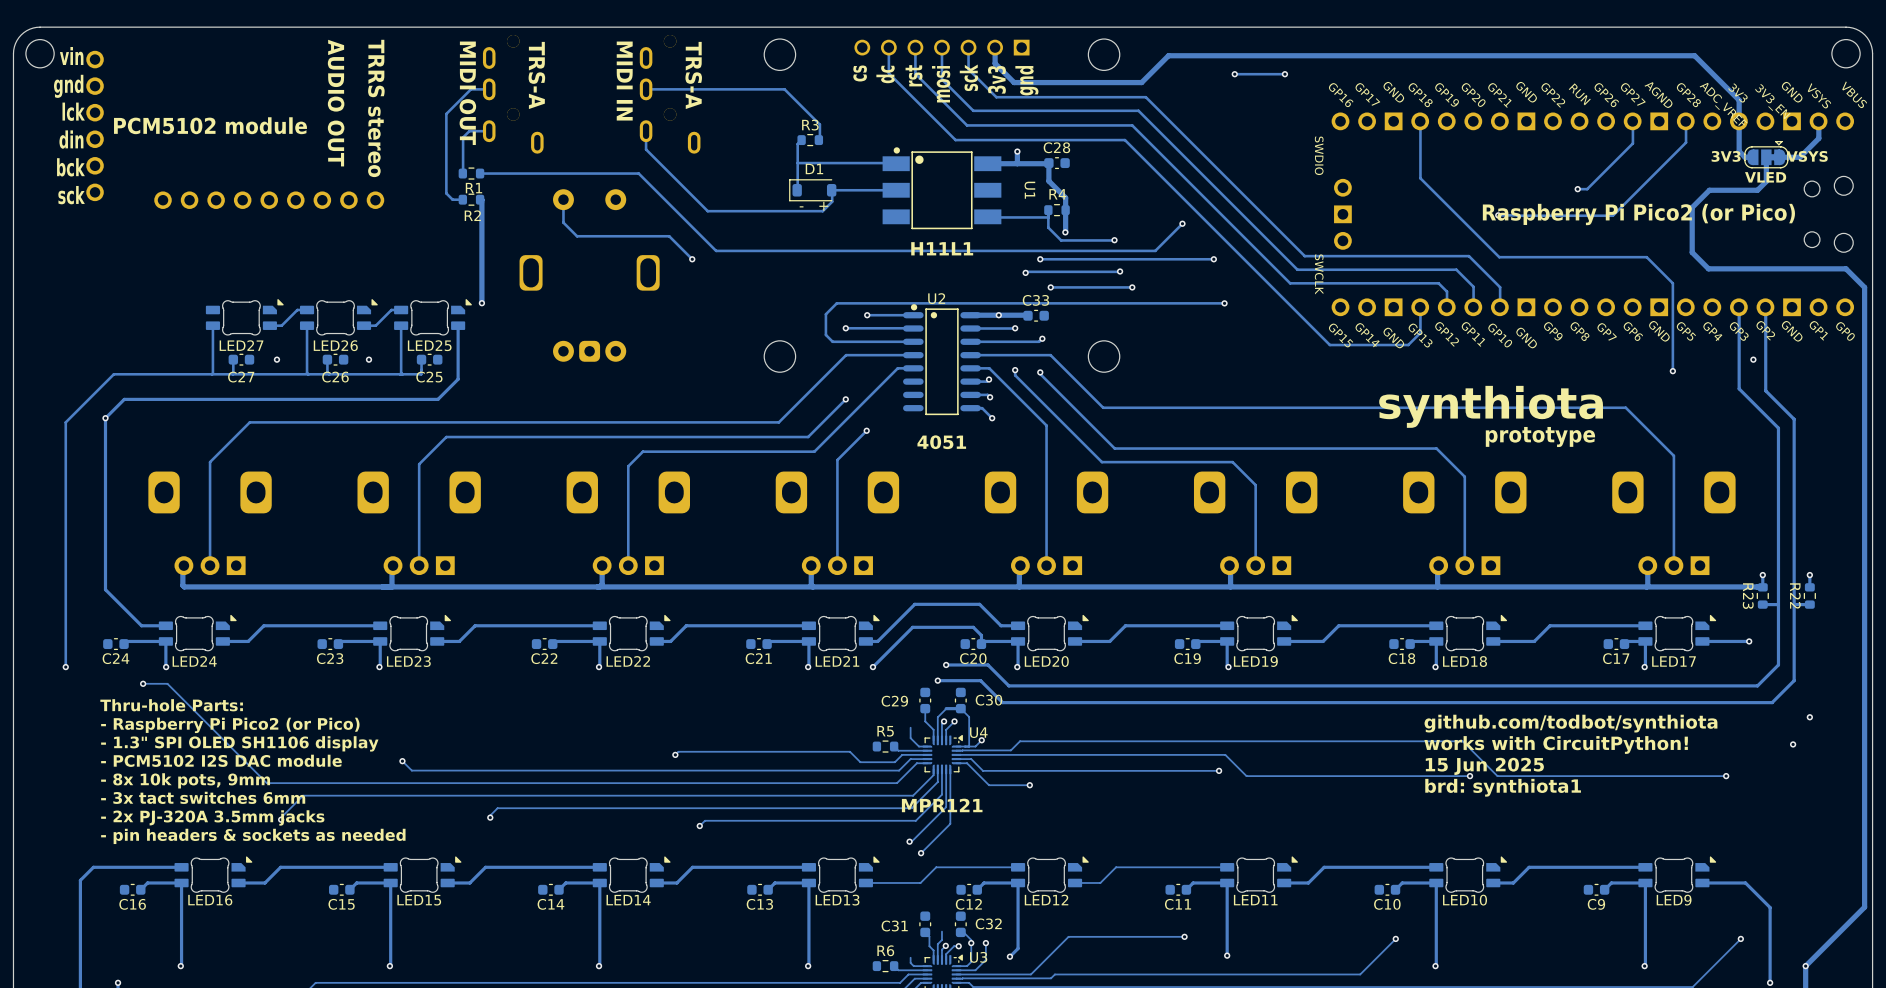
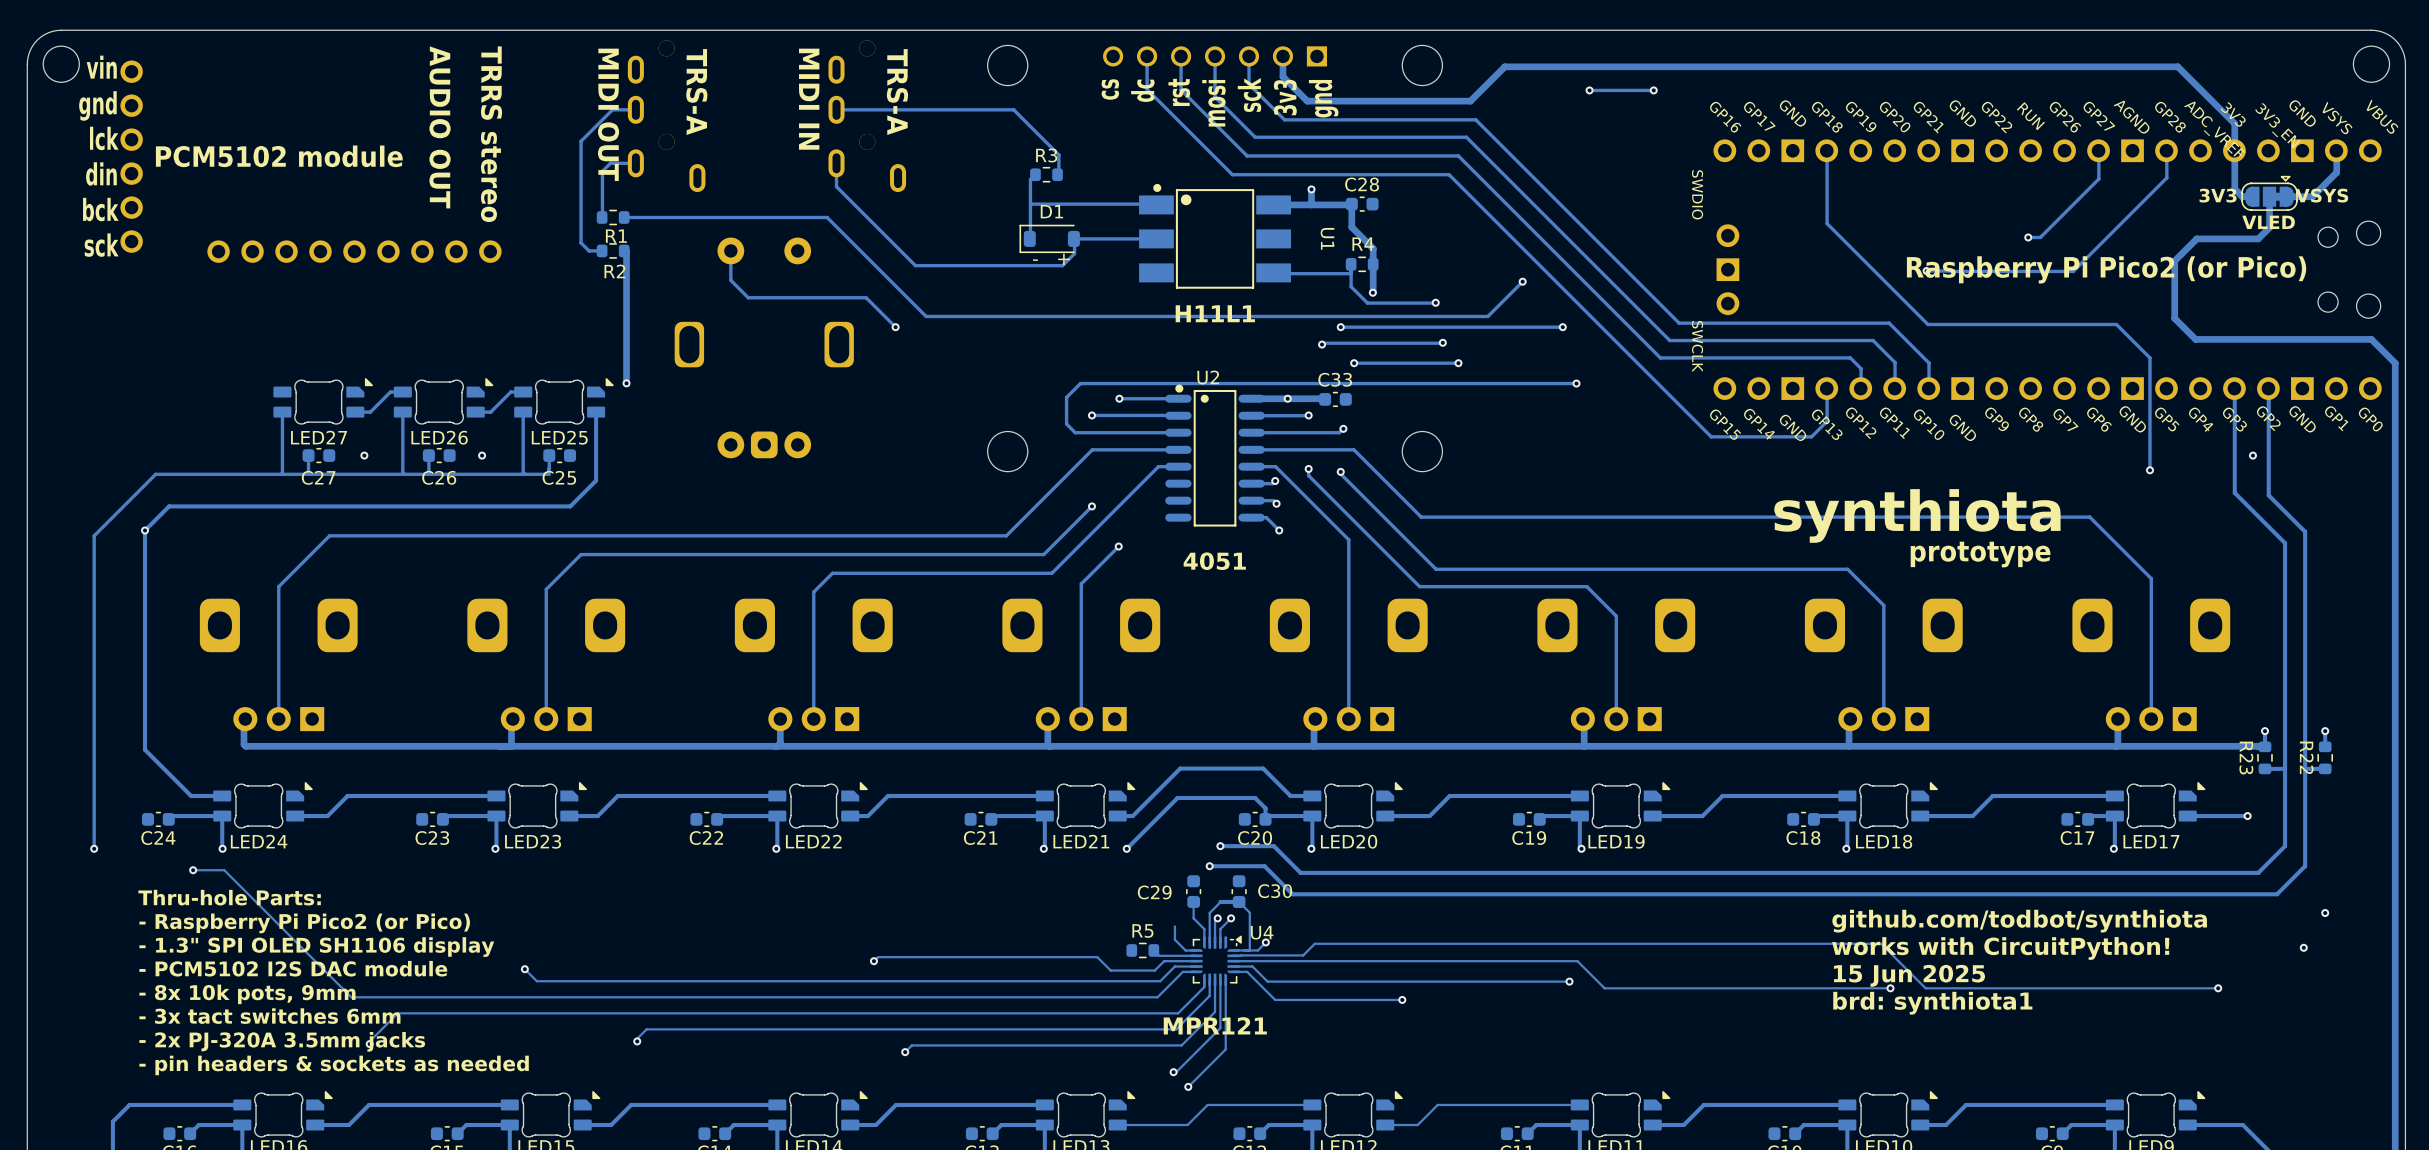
via position: (1029, 785) -> (1402, 999)
track: none -> (1402, 999) (1327, 999)

